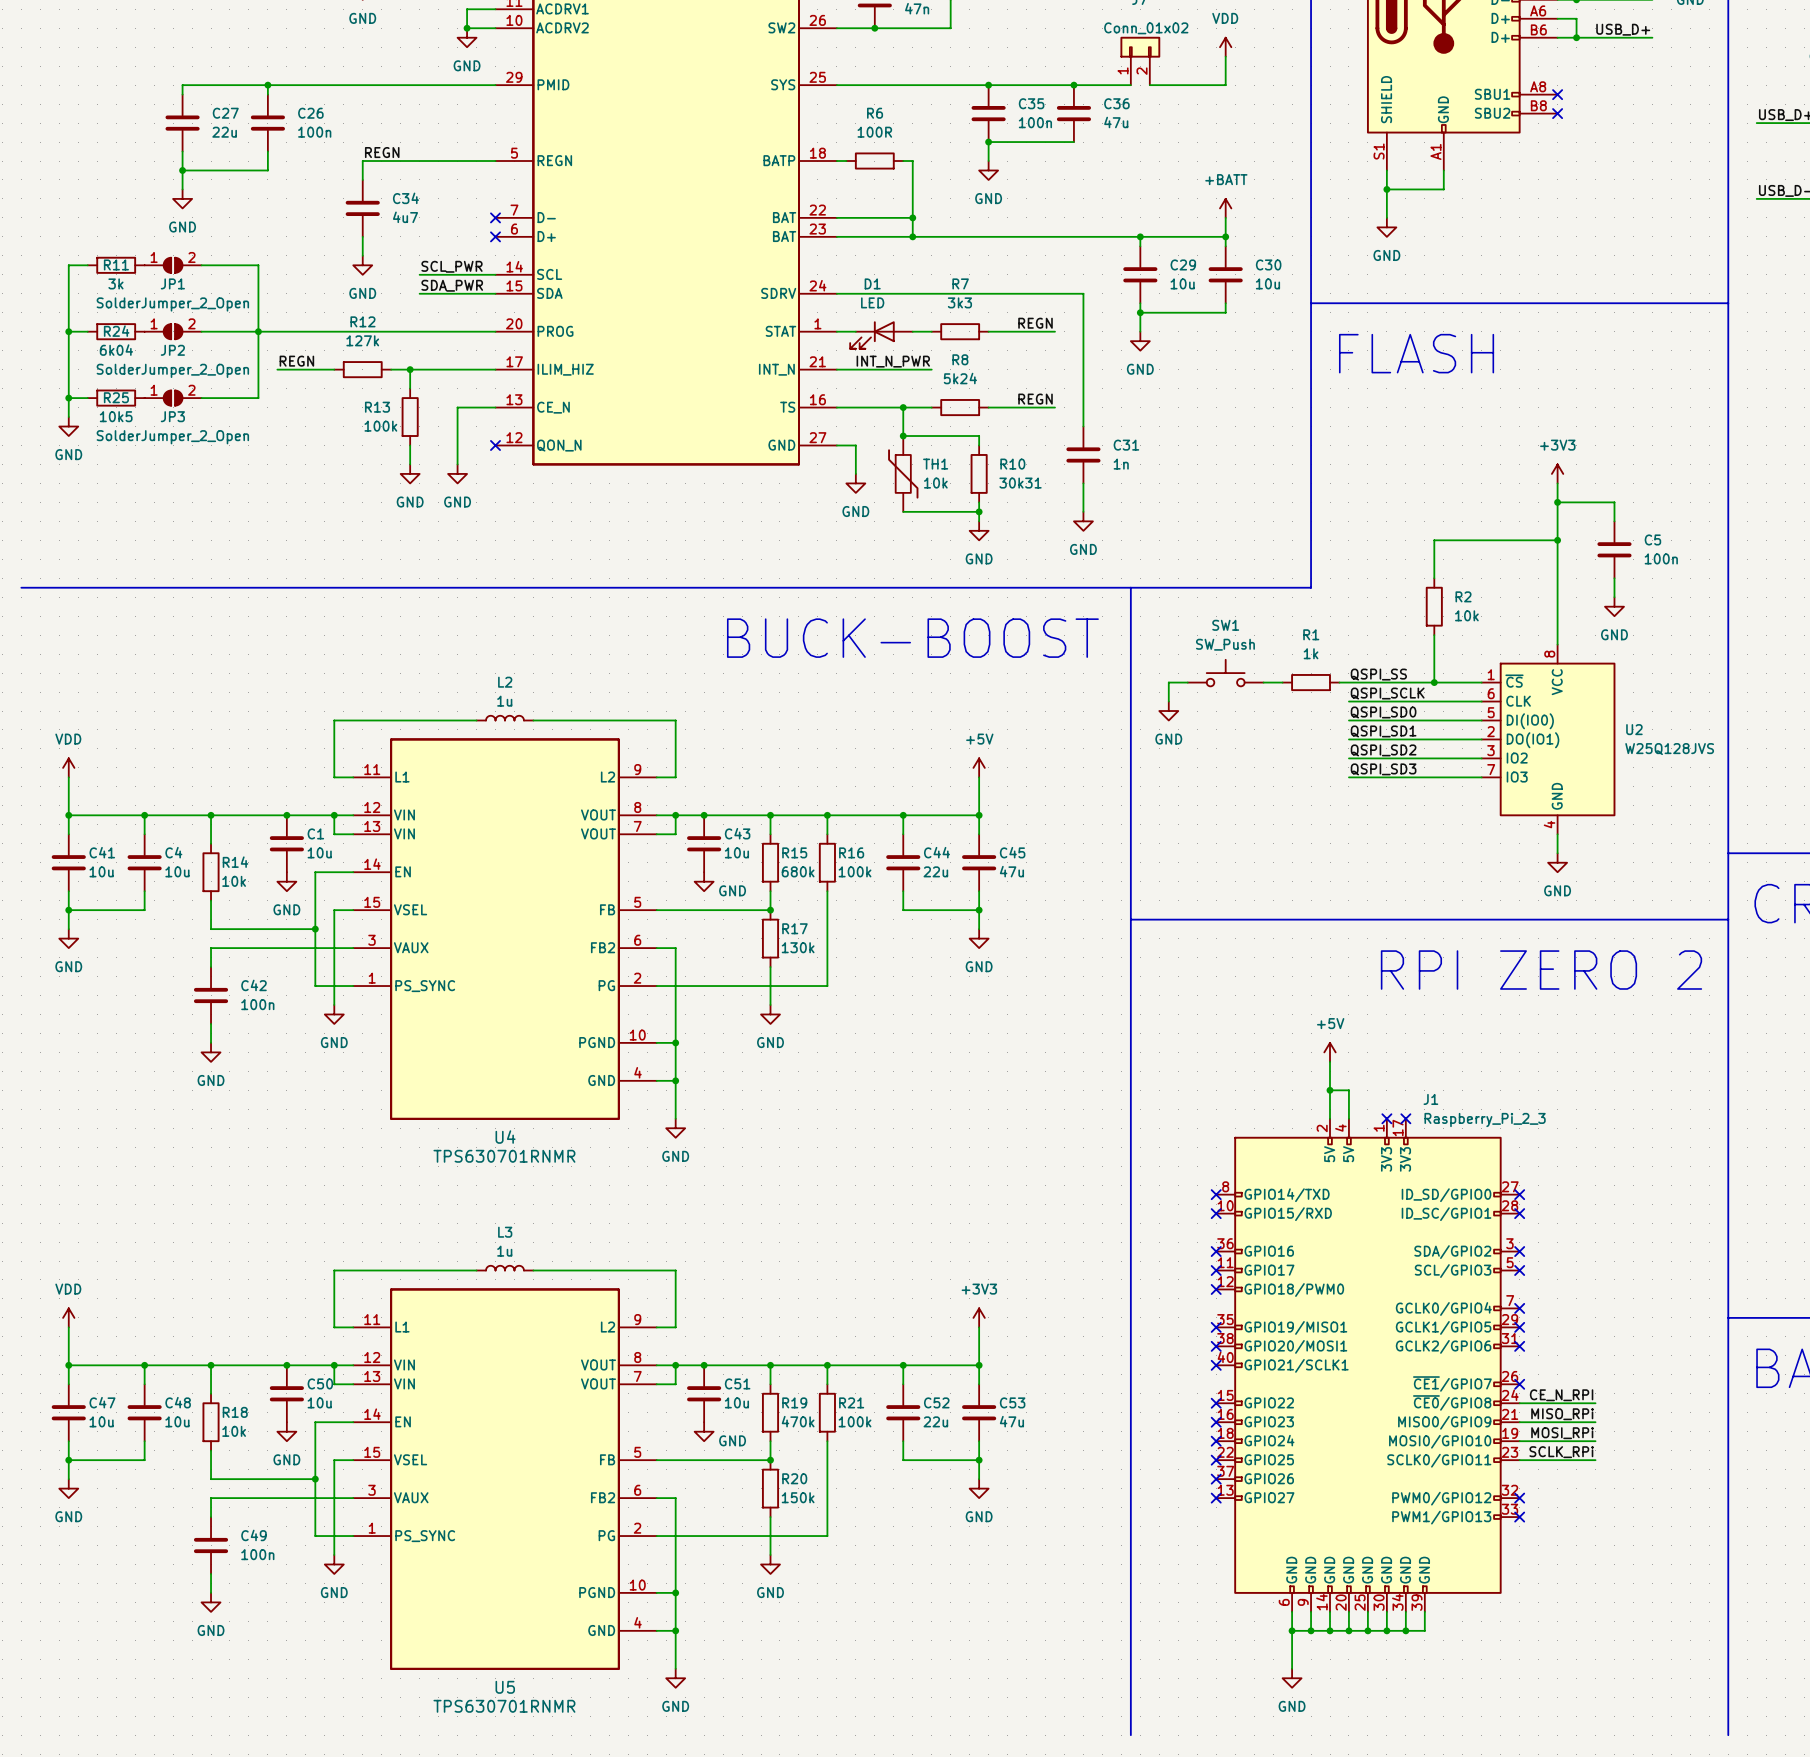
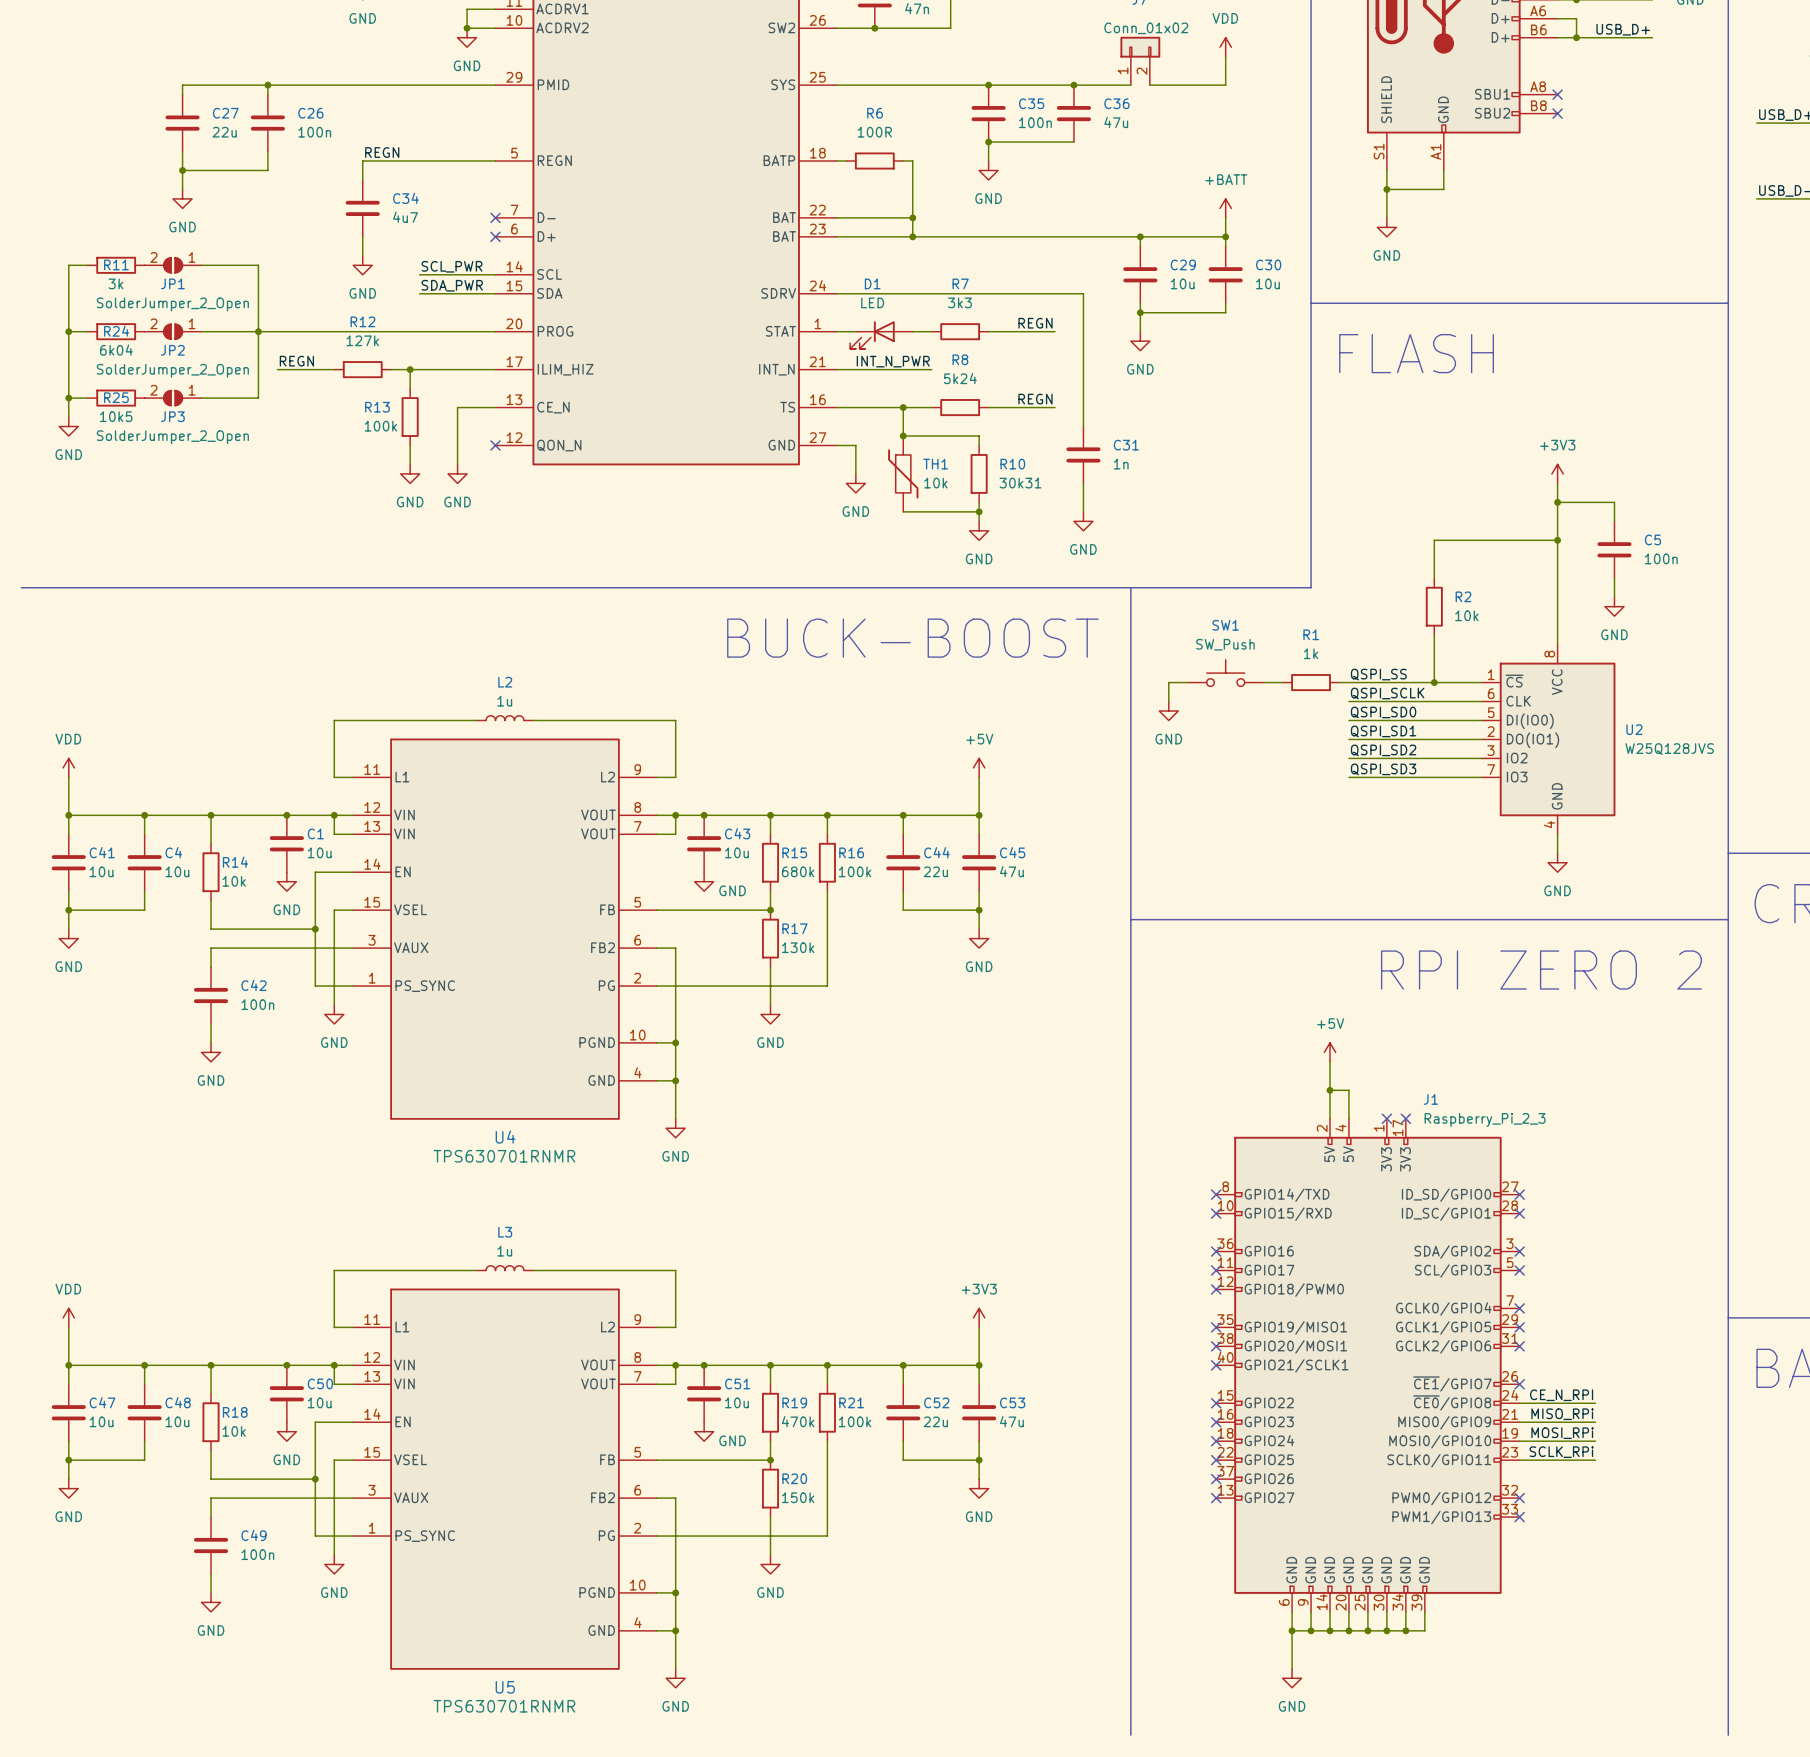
JP1 rotation: 0° (173, 265) -> 180° (173, 265)
JP2 rotation: 0° (173, 331) -> 180° (173, 331)
JP3 rotation: 0° (173, 398) -> 180° (173, 398)

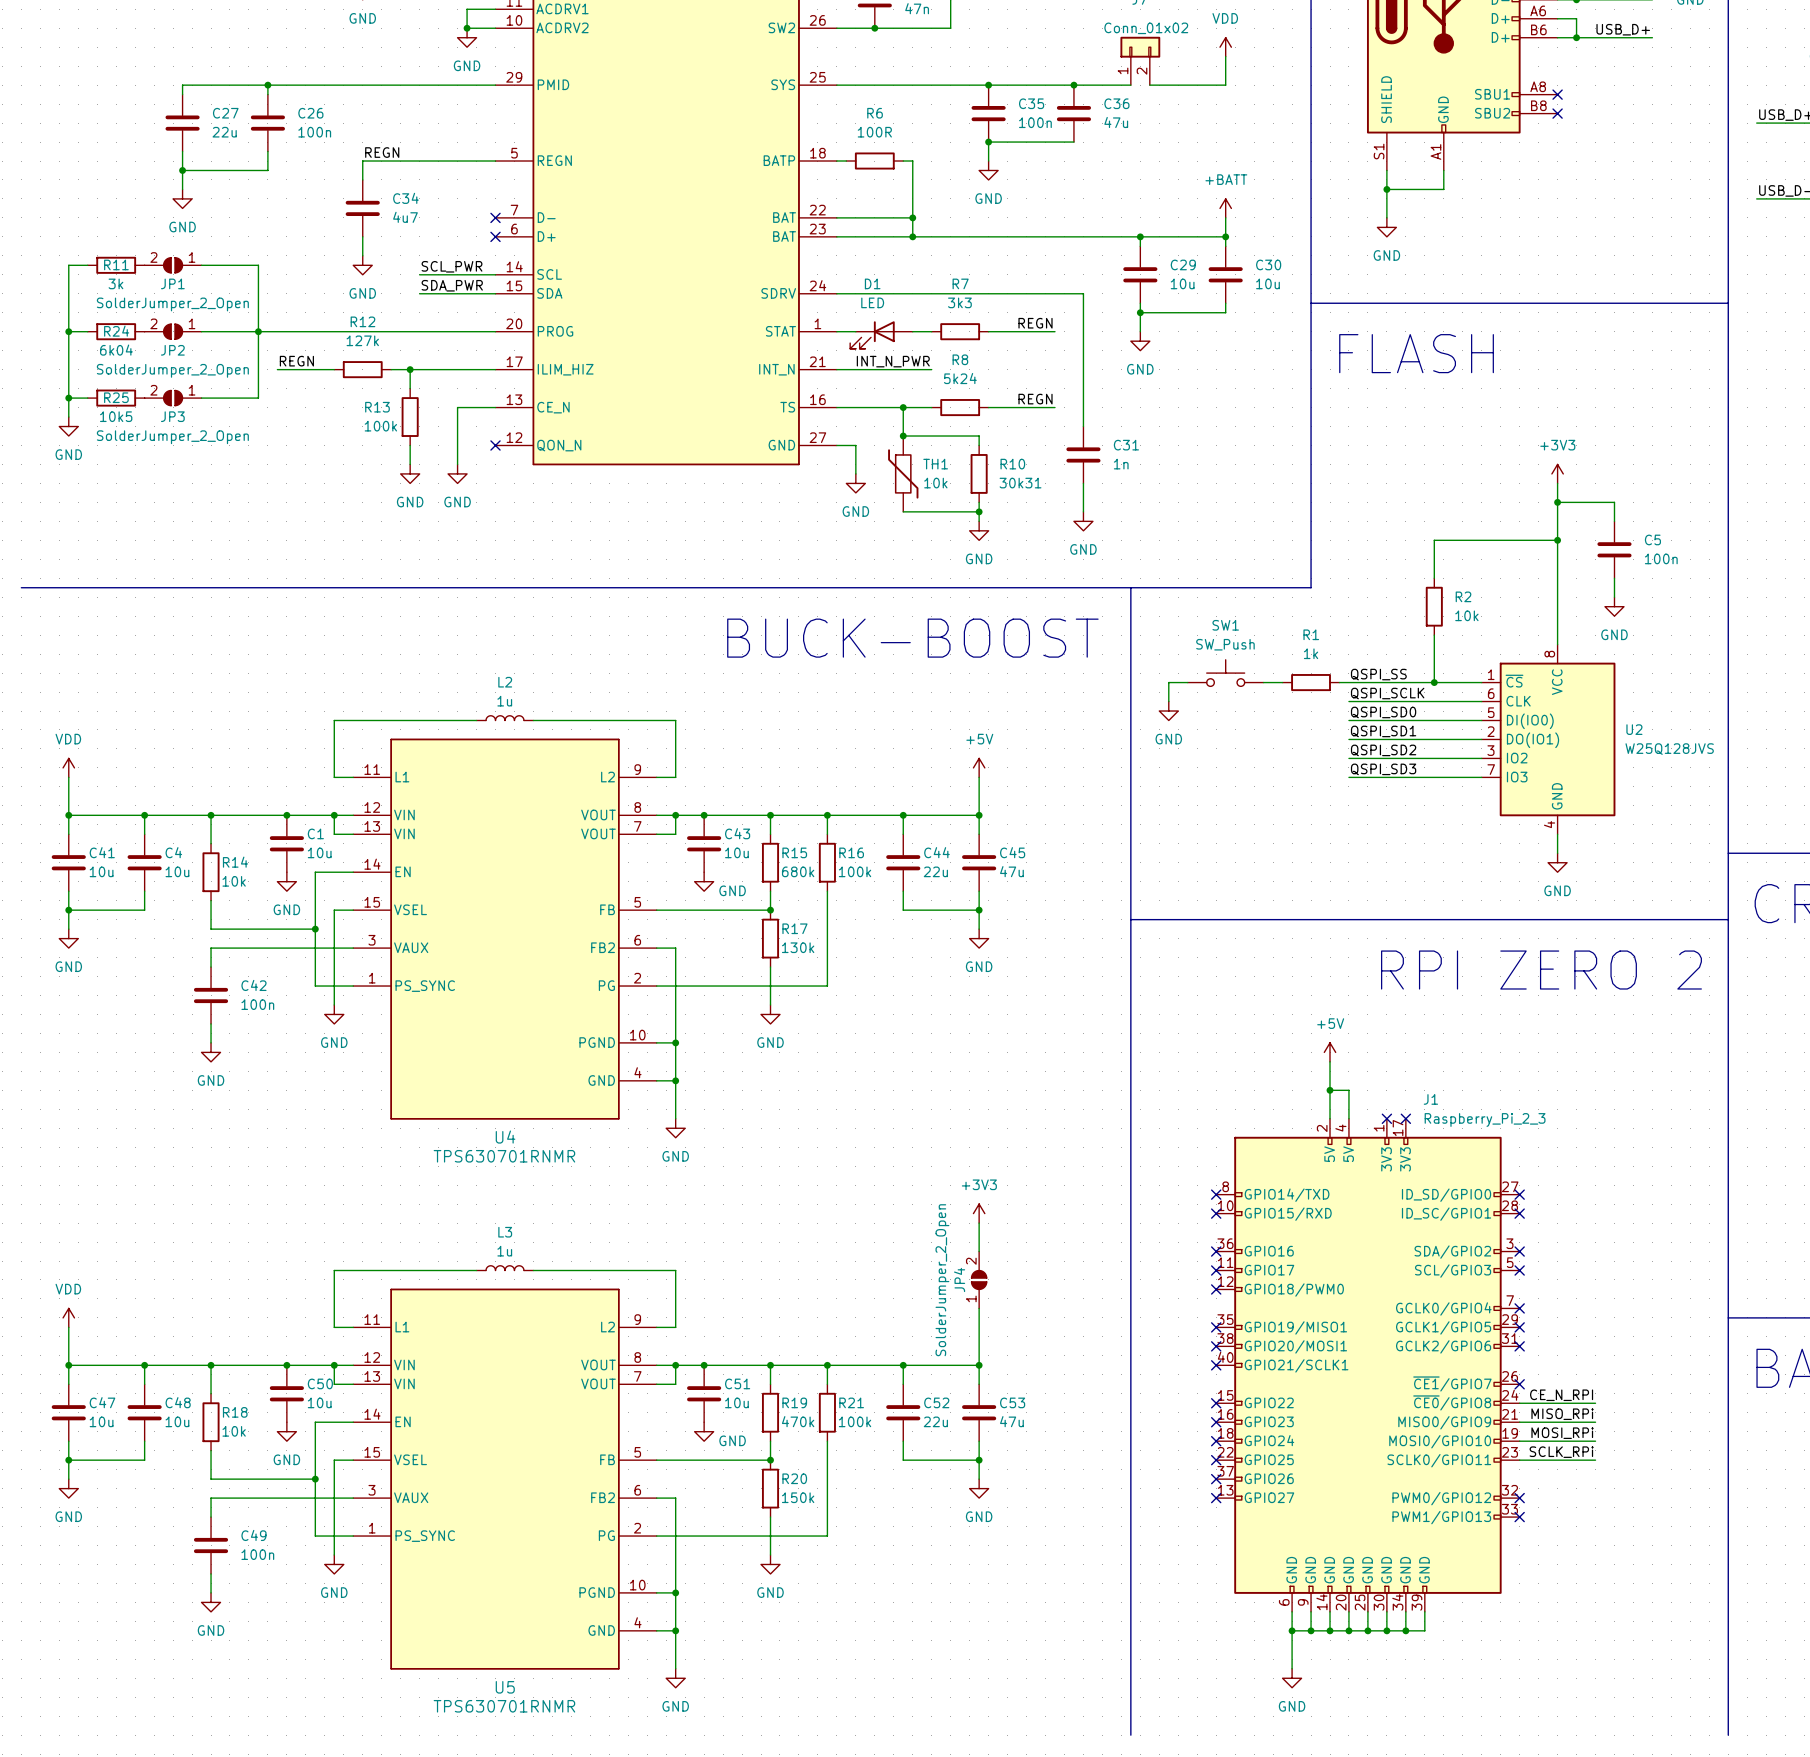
wire: none -> (979, 1223) (979, 1251)
JP4: none -> SolderJumper_2_Open (979, 1279)
power symbol position: +3V3 (979, 1317) -> +3V3 (979, 1213)

